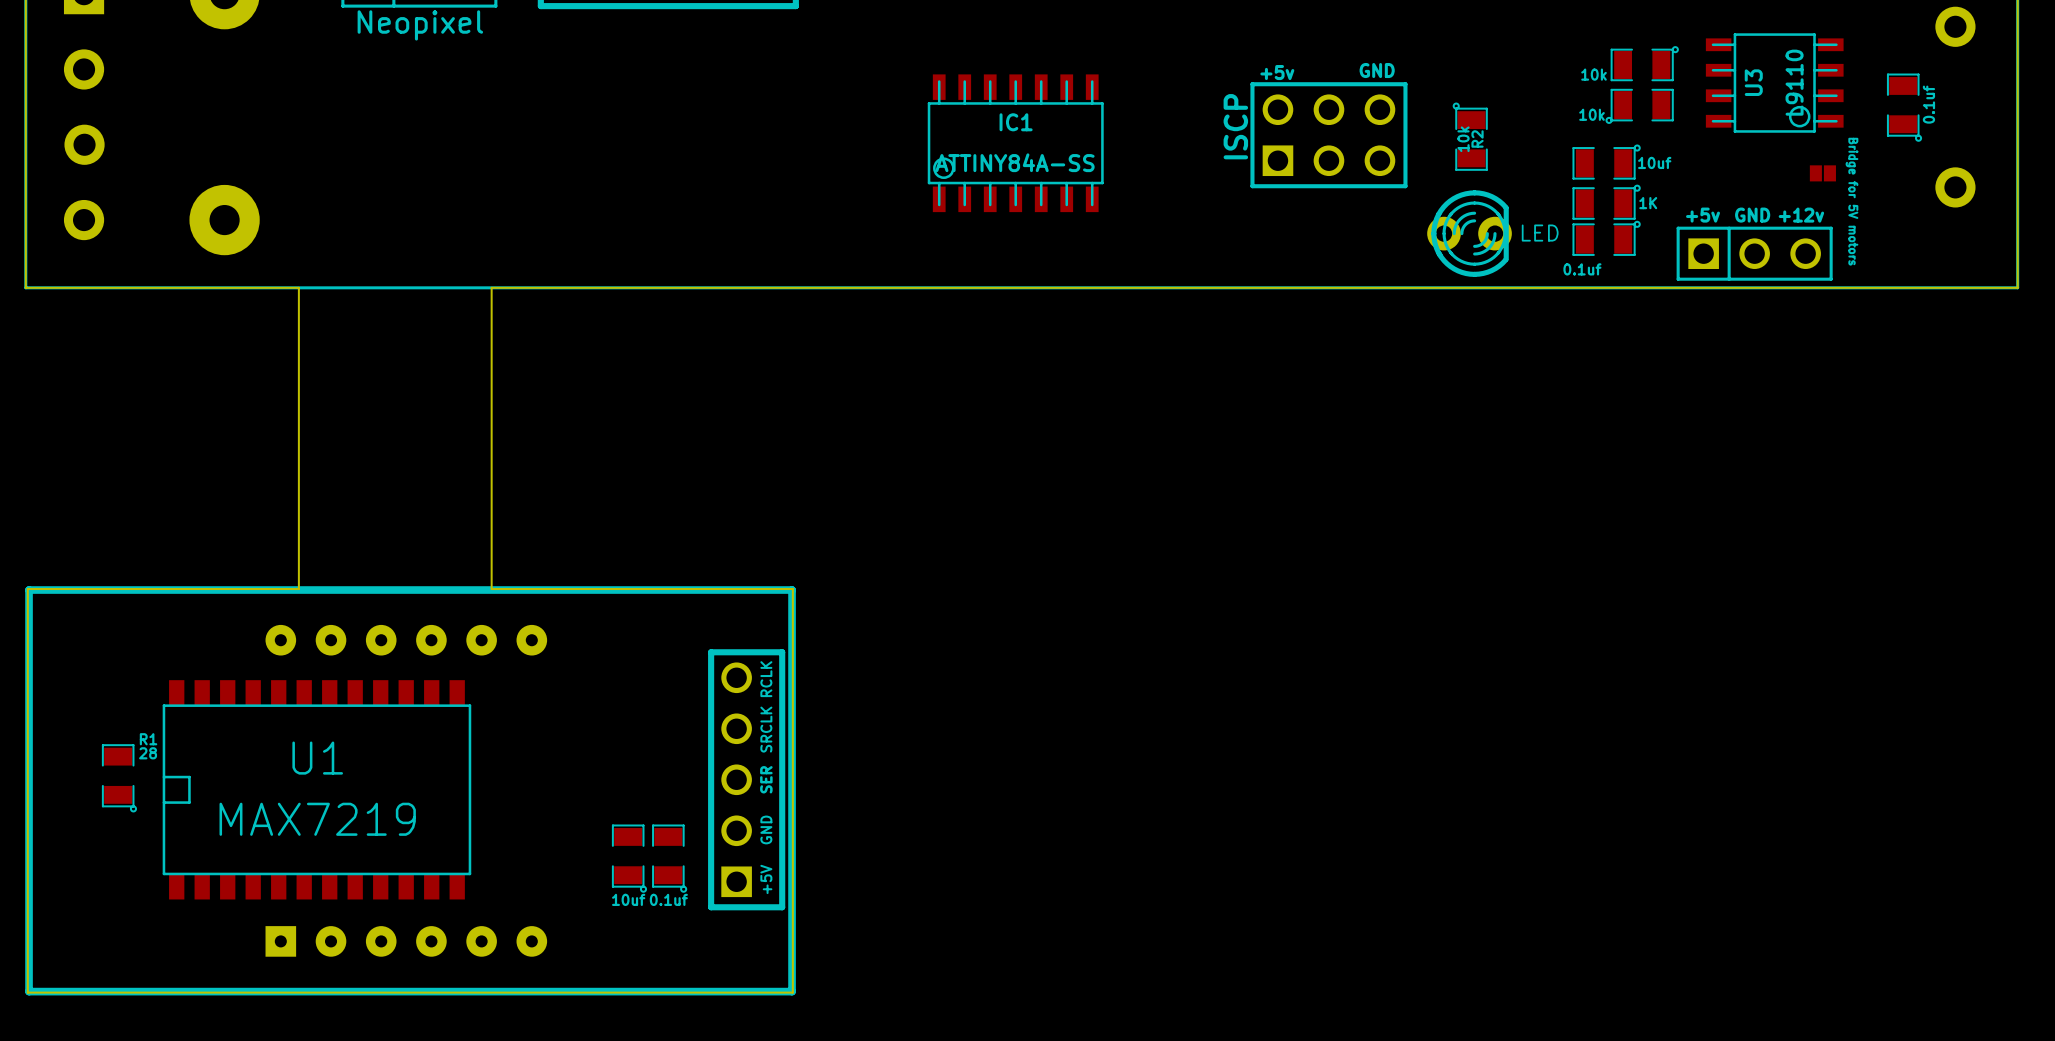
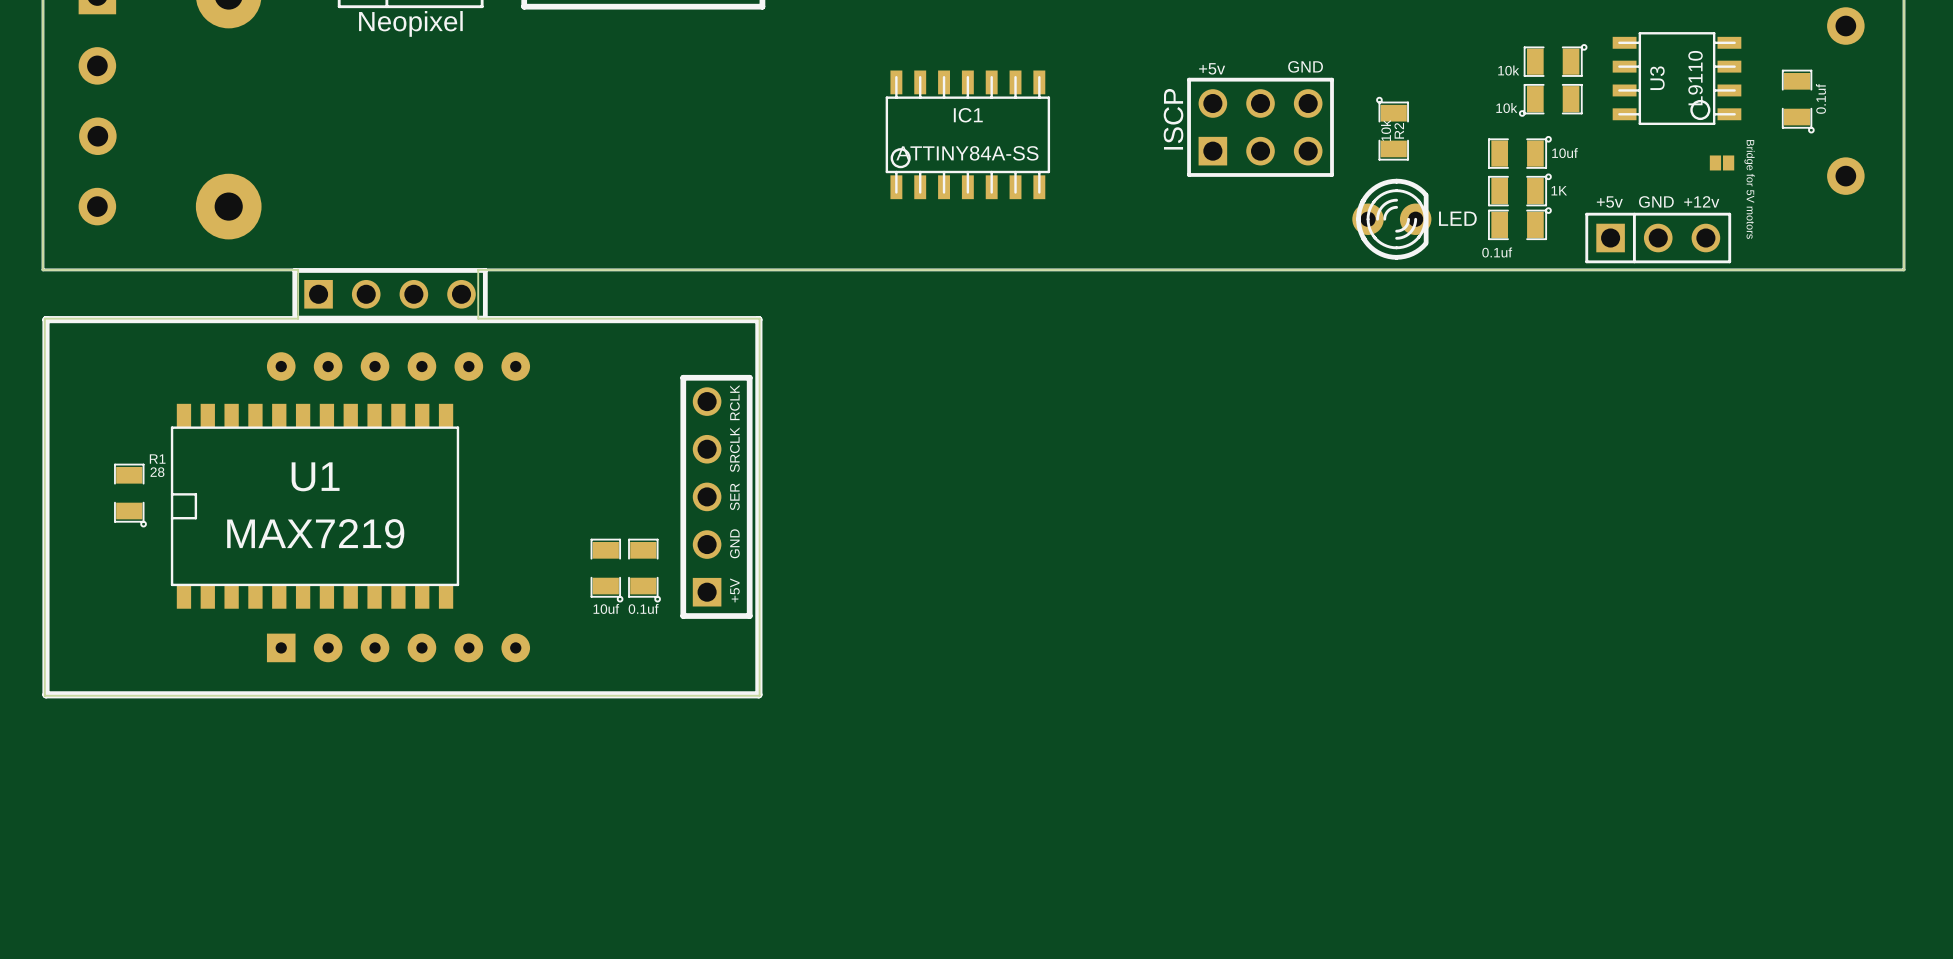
part: none -> (390, 294)
board edge: (298, 340) (298, 589) (27, 589) -> (298, 318) (44, 318) (44, 551)
board edge: (491, 340) (491, 589) (792, 589) -> (478, 318) (759, 318) (759, 551)
board edge: (27, 743) (27, 992) (792, 992) (792, 743) -> (44, 695) (759, 695)
R1 position: (119, 778) -> (130, 495)
part position: (746, 779) -> (716, 496)
U1 position: (316, 789) -> (315, 506)
part position: (410, 790) -> (402, 507)
part position: (629, 858) -> (606, 570)
part position: (669, 858) -> (644, 570)

